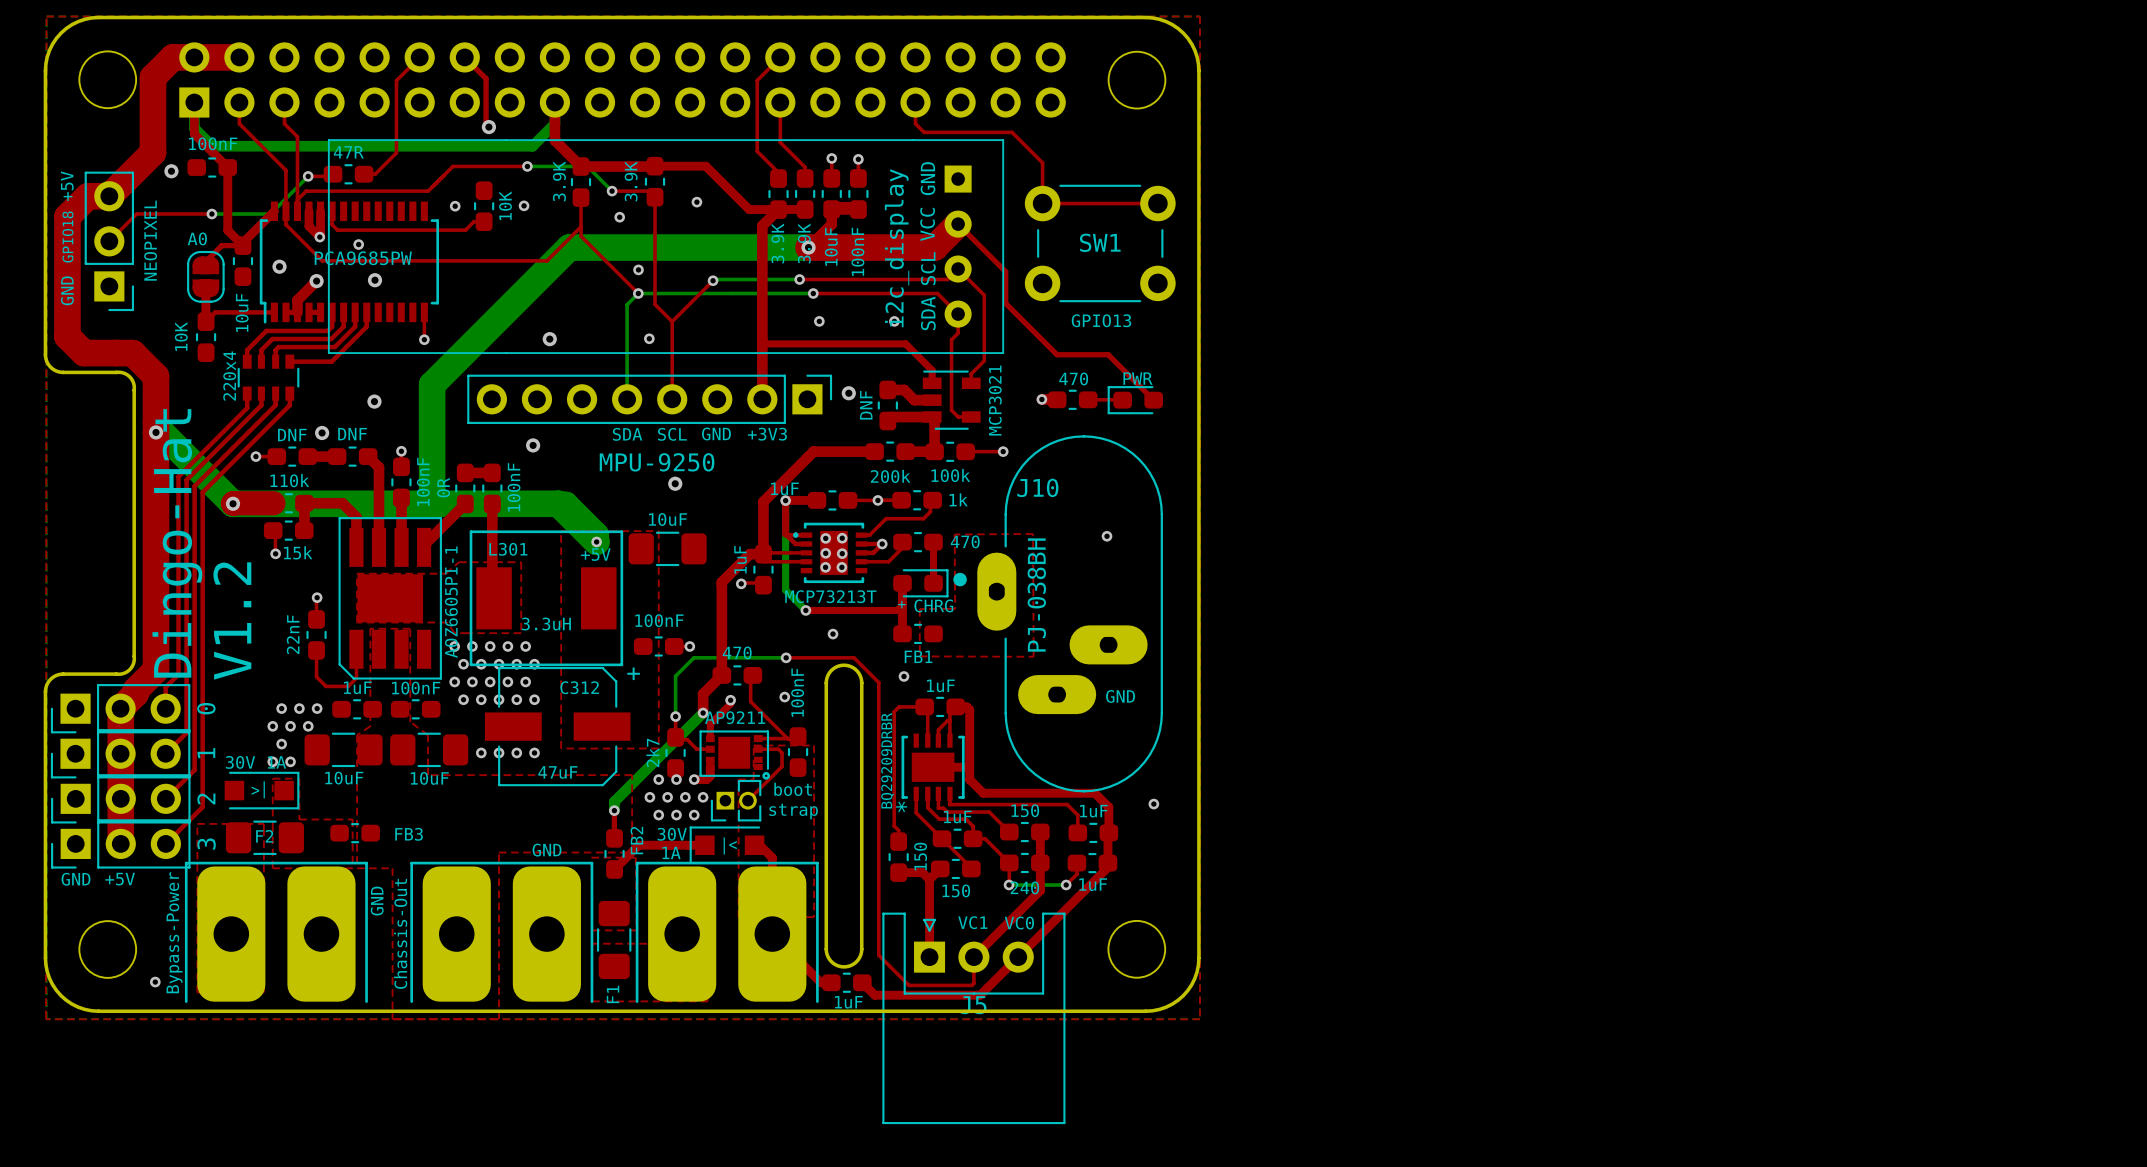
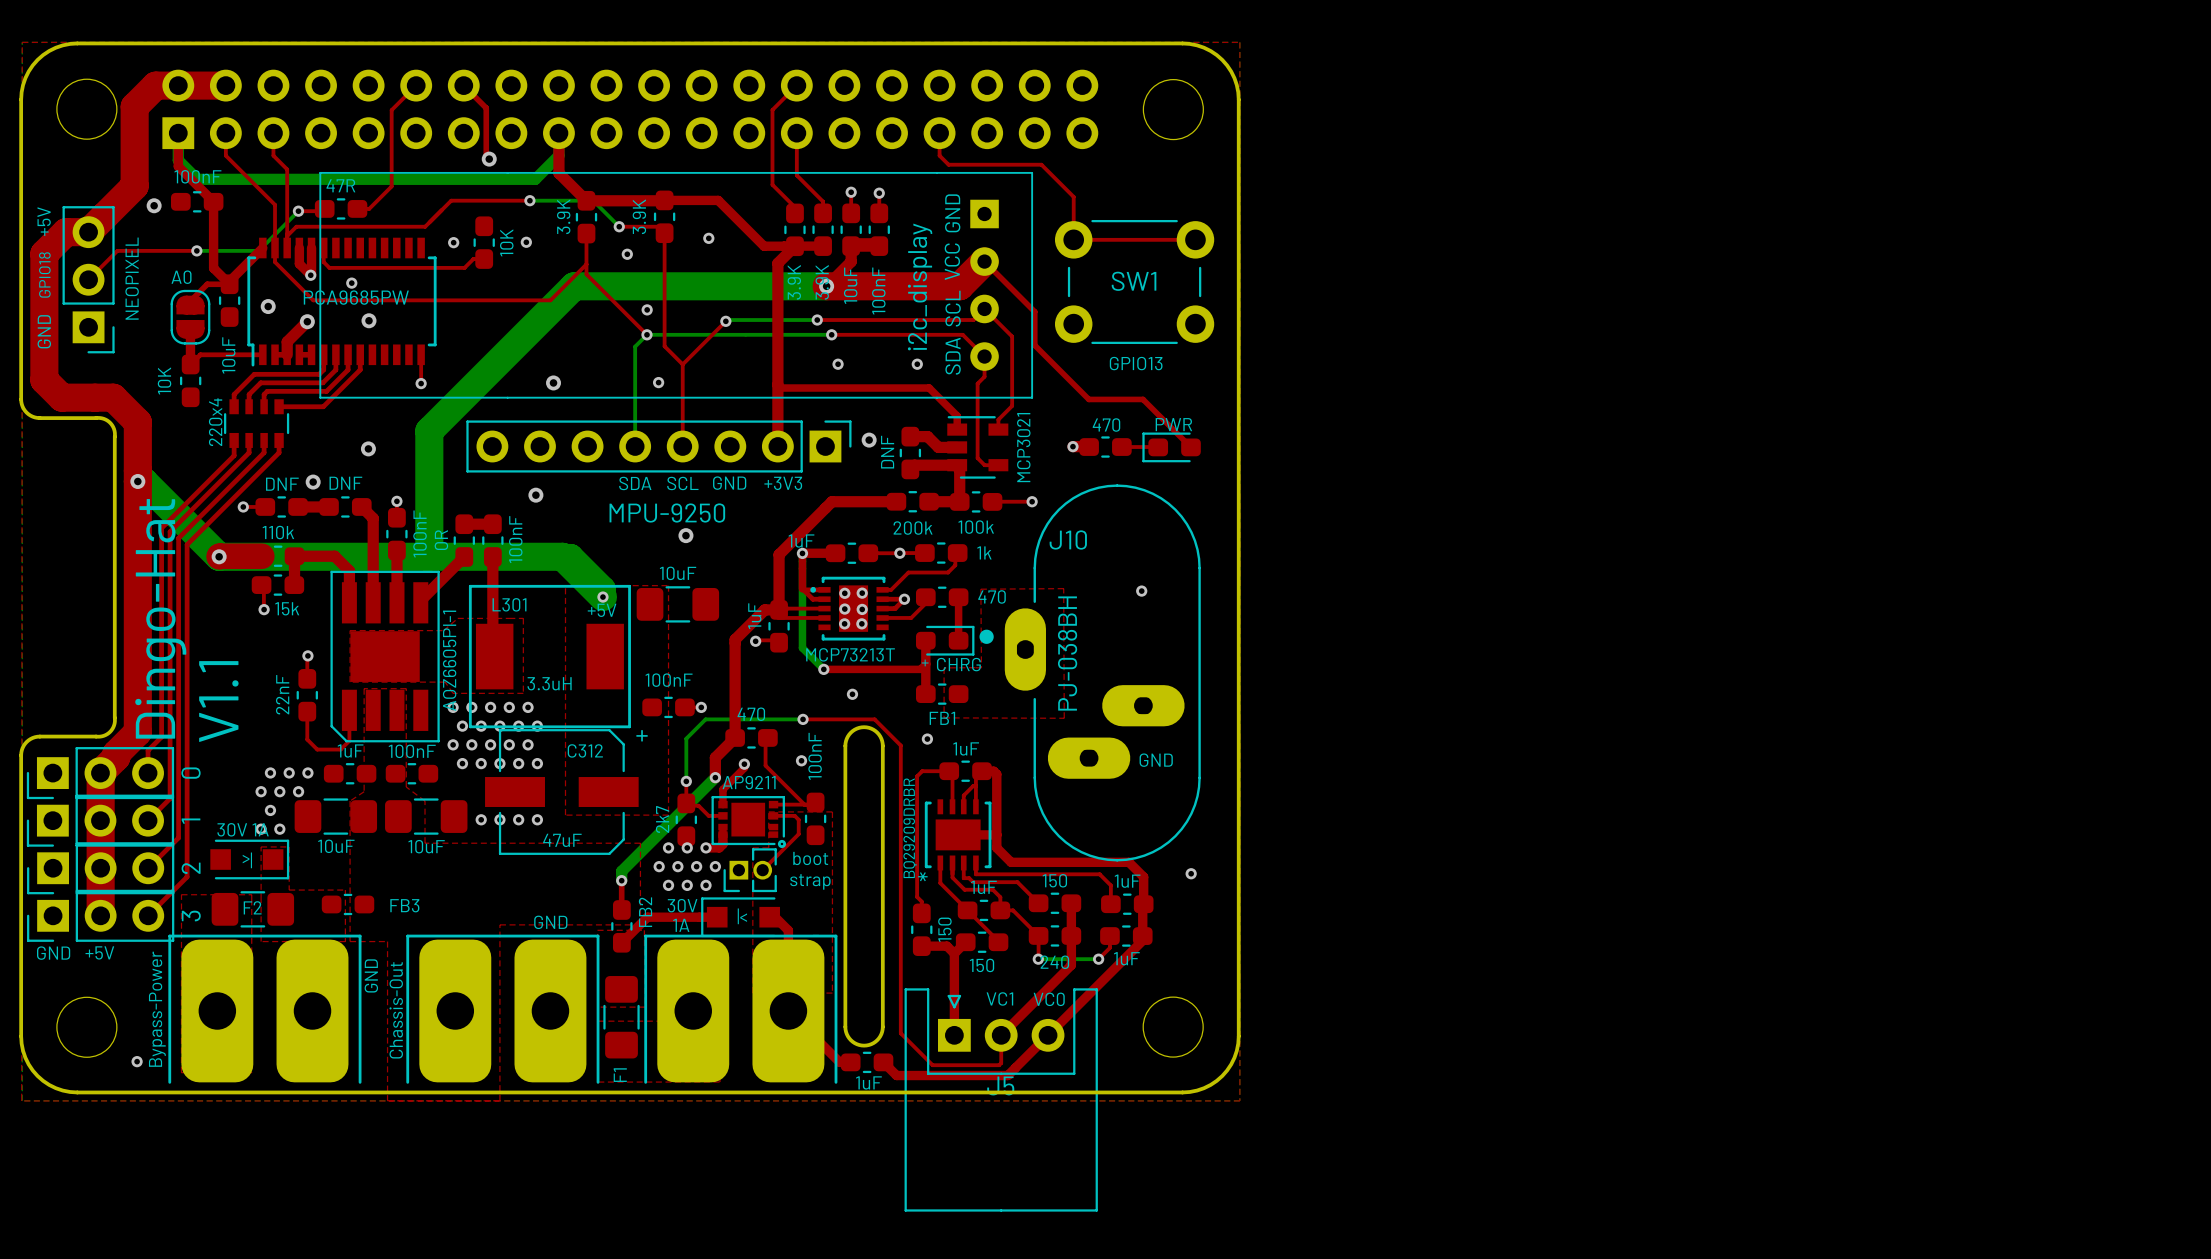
text: V1.2 (232, 621) -> V1.1 (218, 701)

